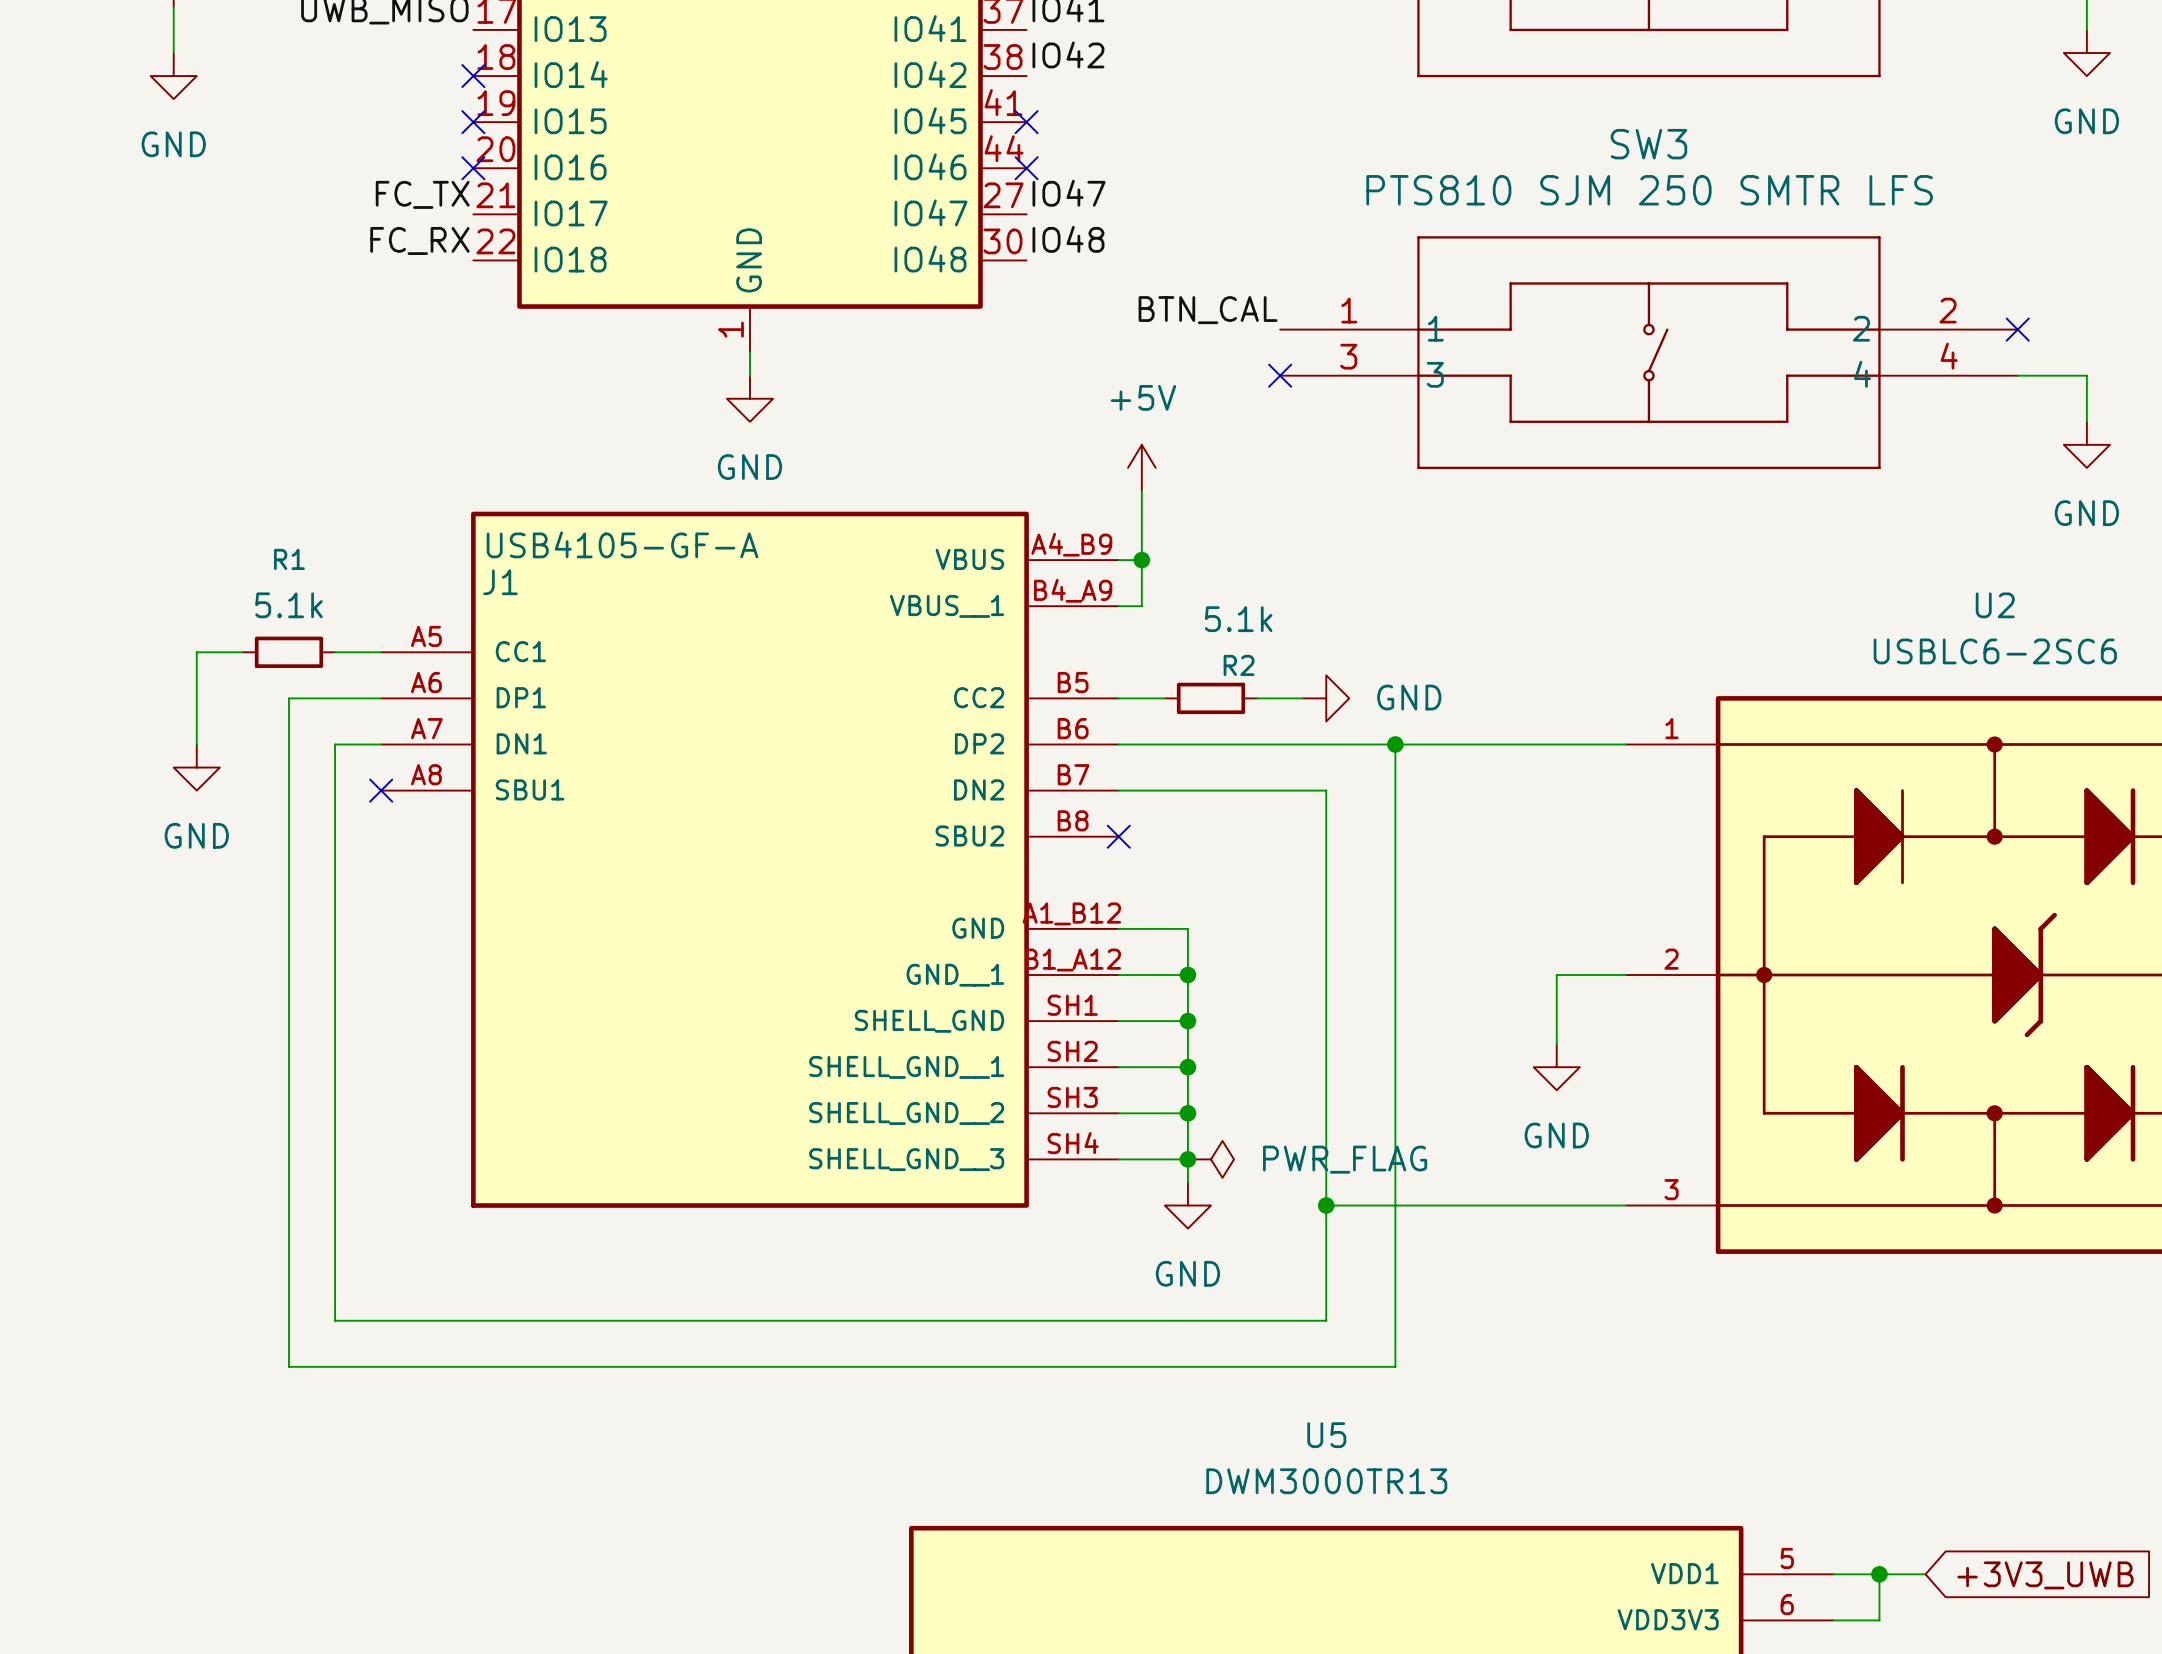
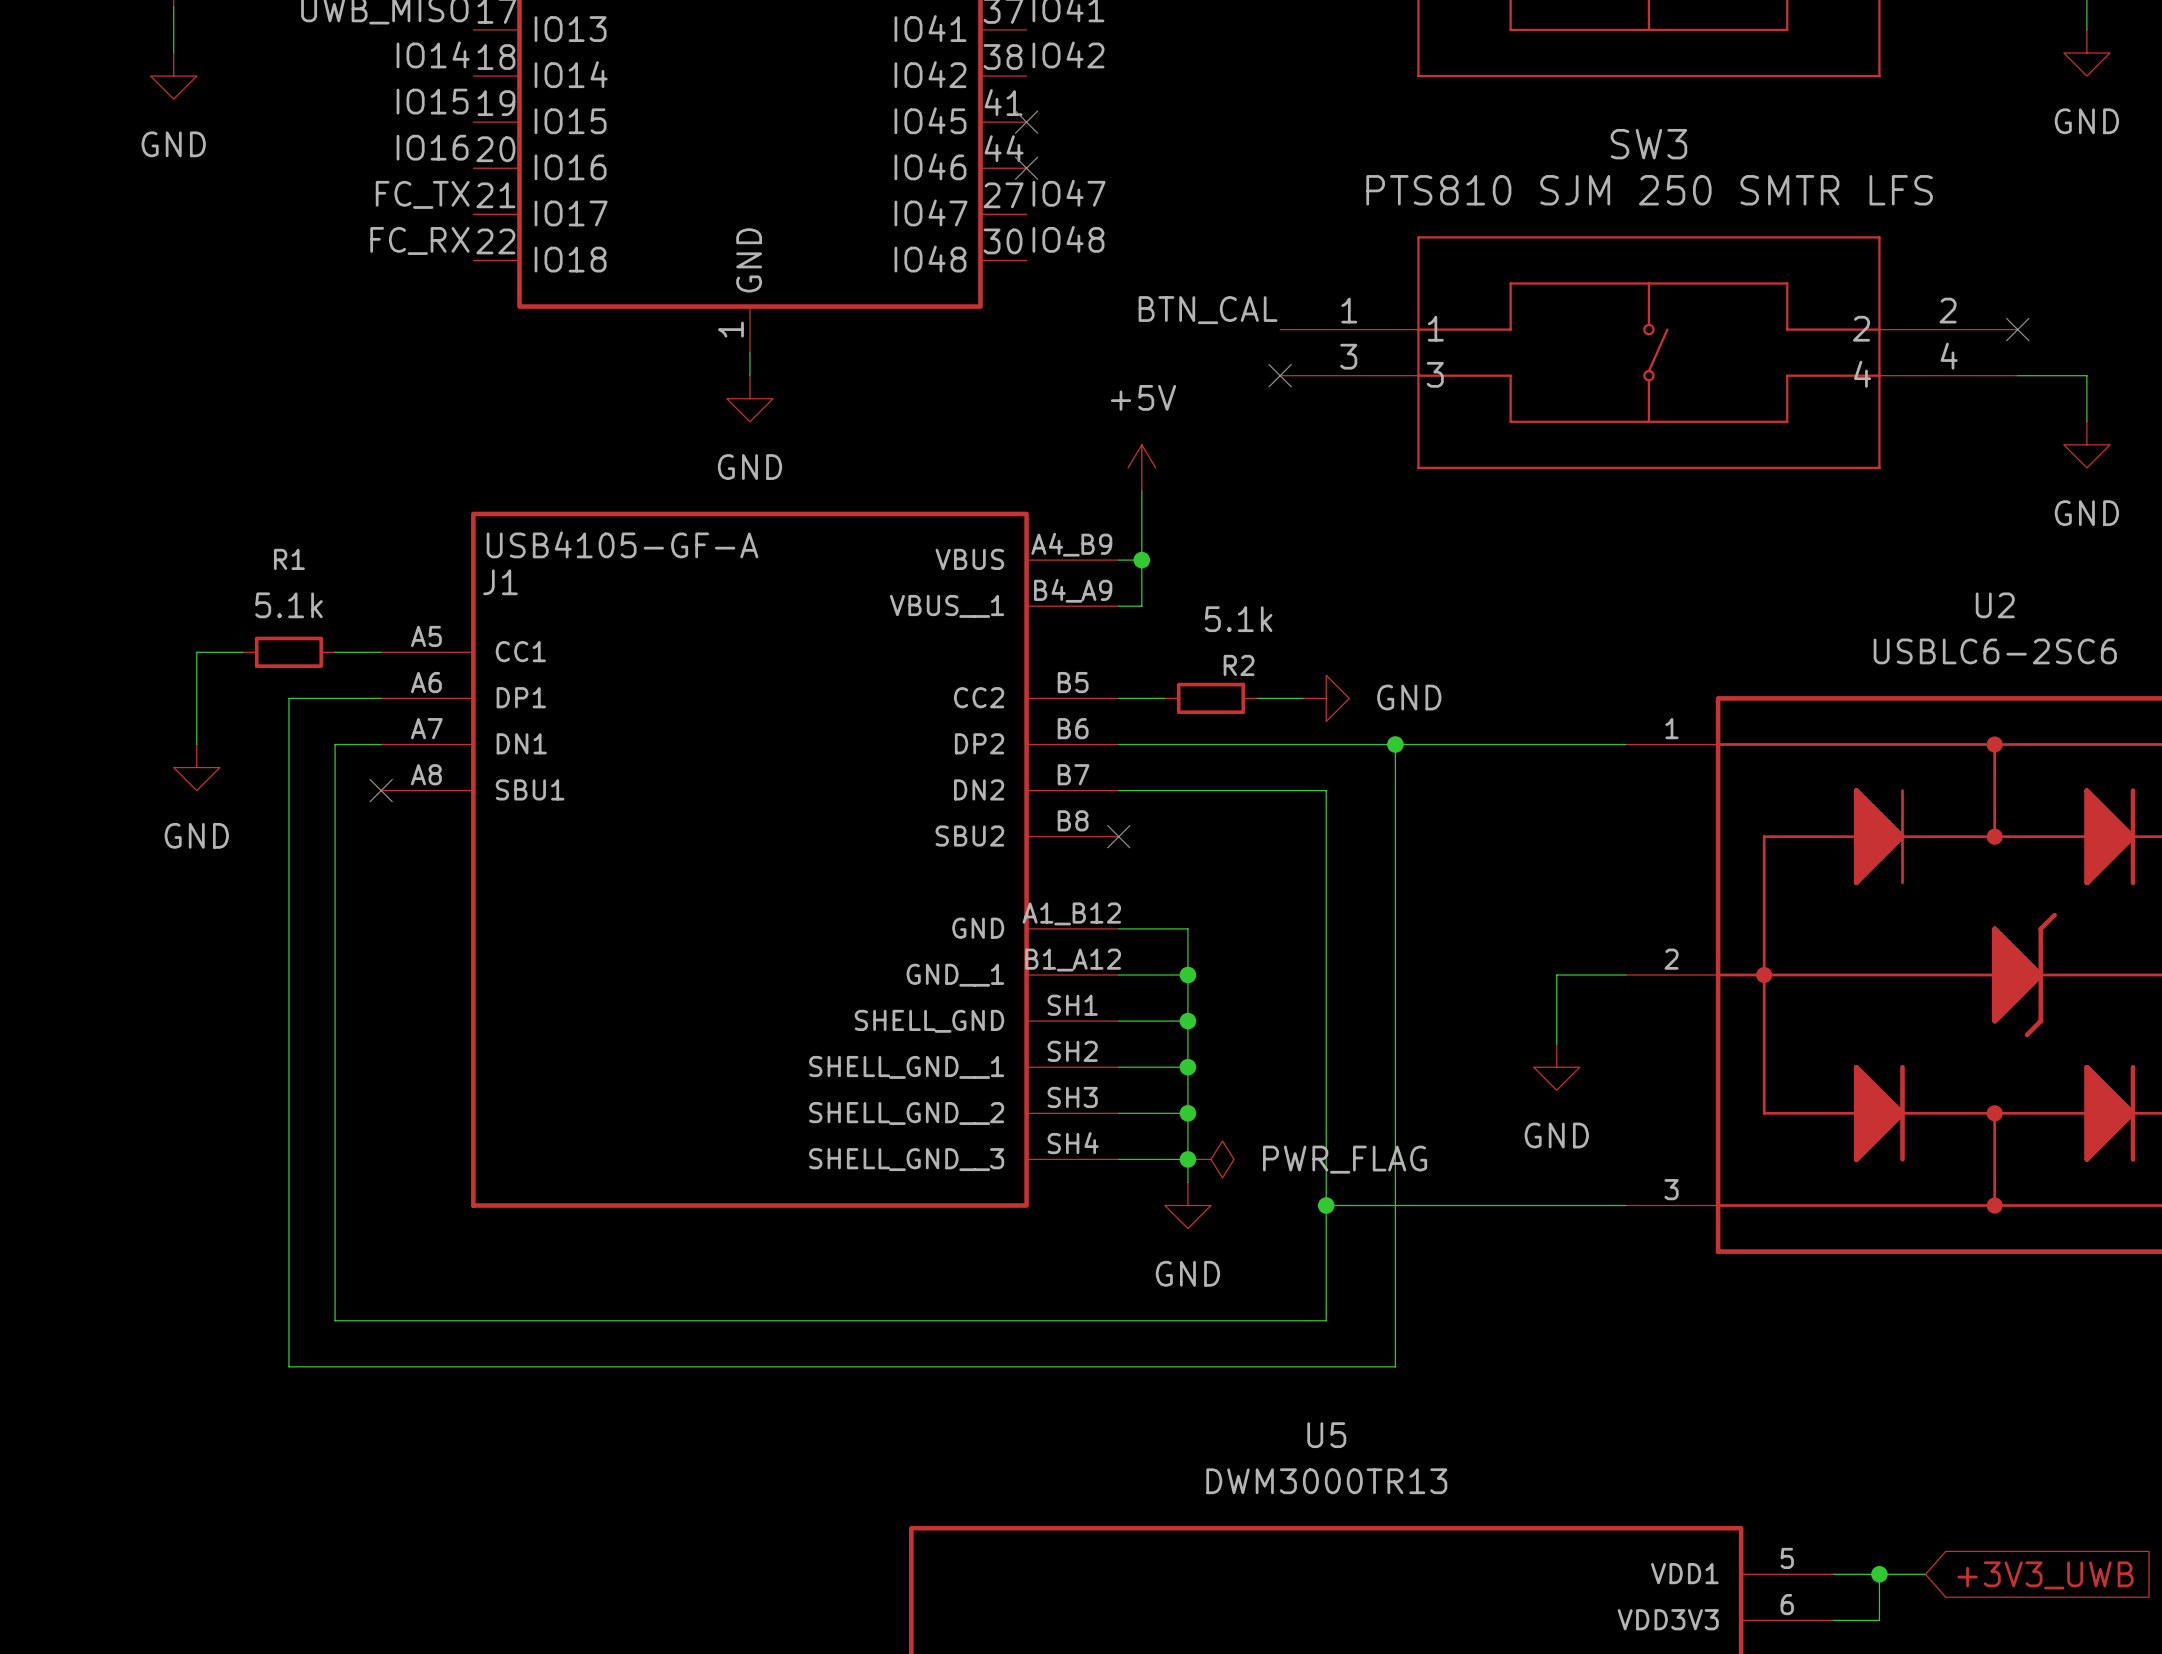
label: none -> IO14 (433, 54)
no-connect mark: (473, 76) -> none
label: none -> IO15 (432, 101)
no-connect mark: (473, 122) -> none
label: none -> IO16 (432, 147)
no-connect mark: (473, 168) -> none

